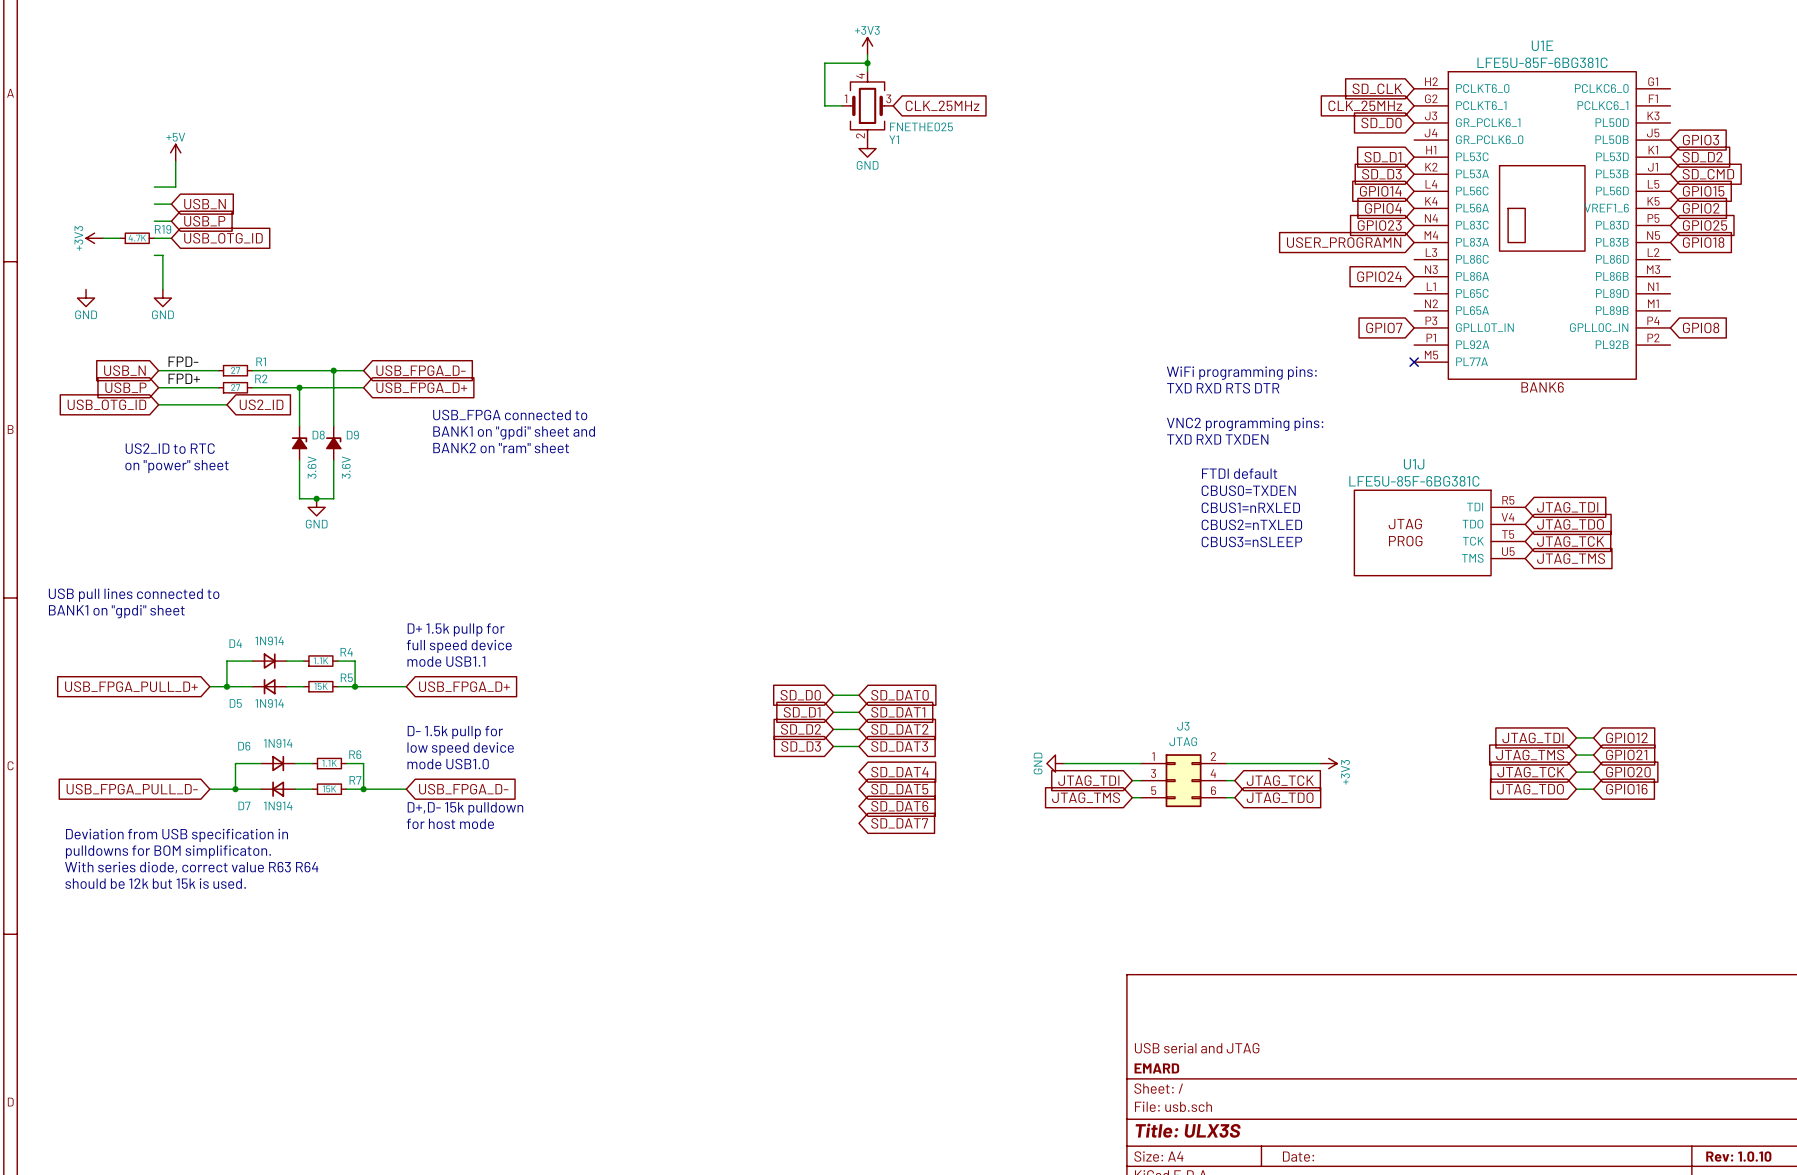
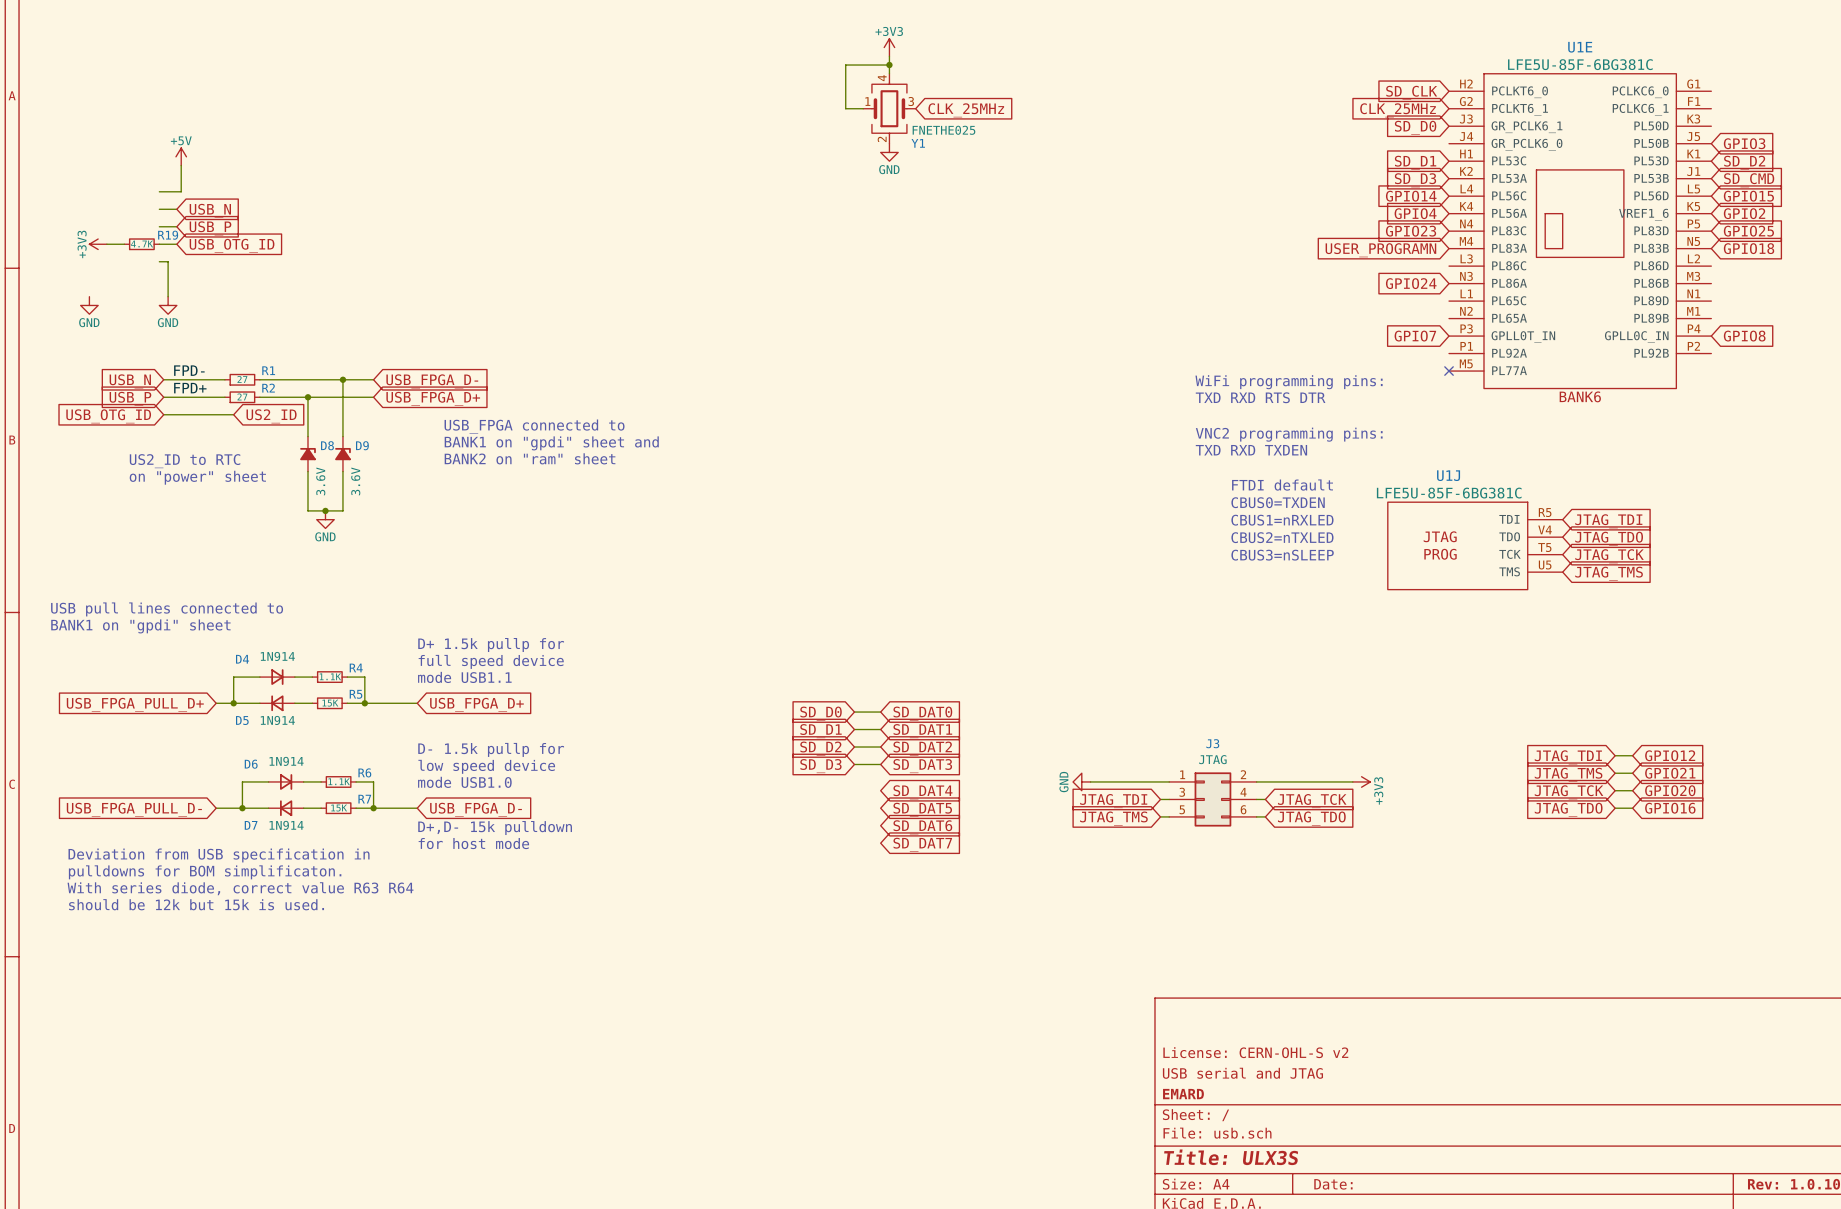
title block: none -> License: CERN-OHL-S v2 (1255, 1052)

